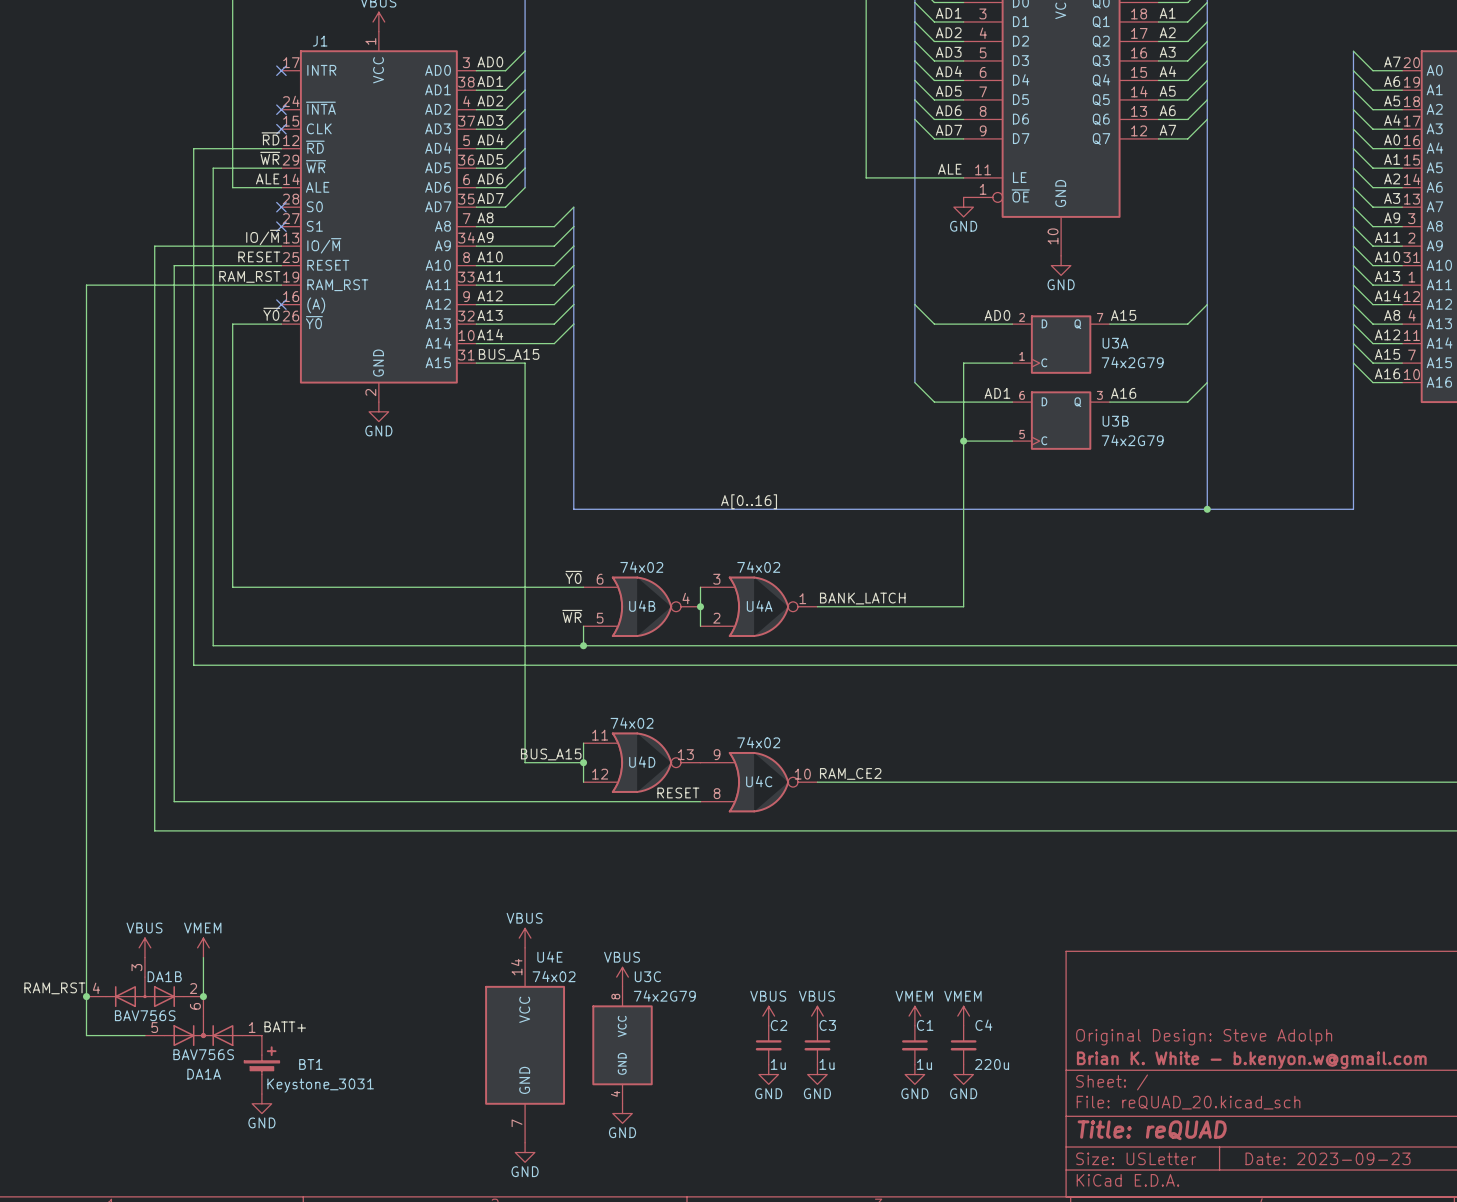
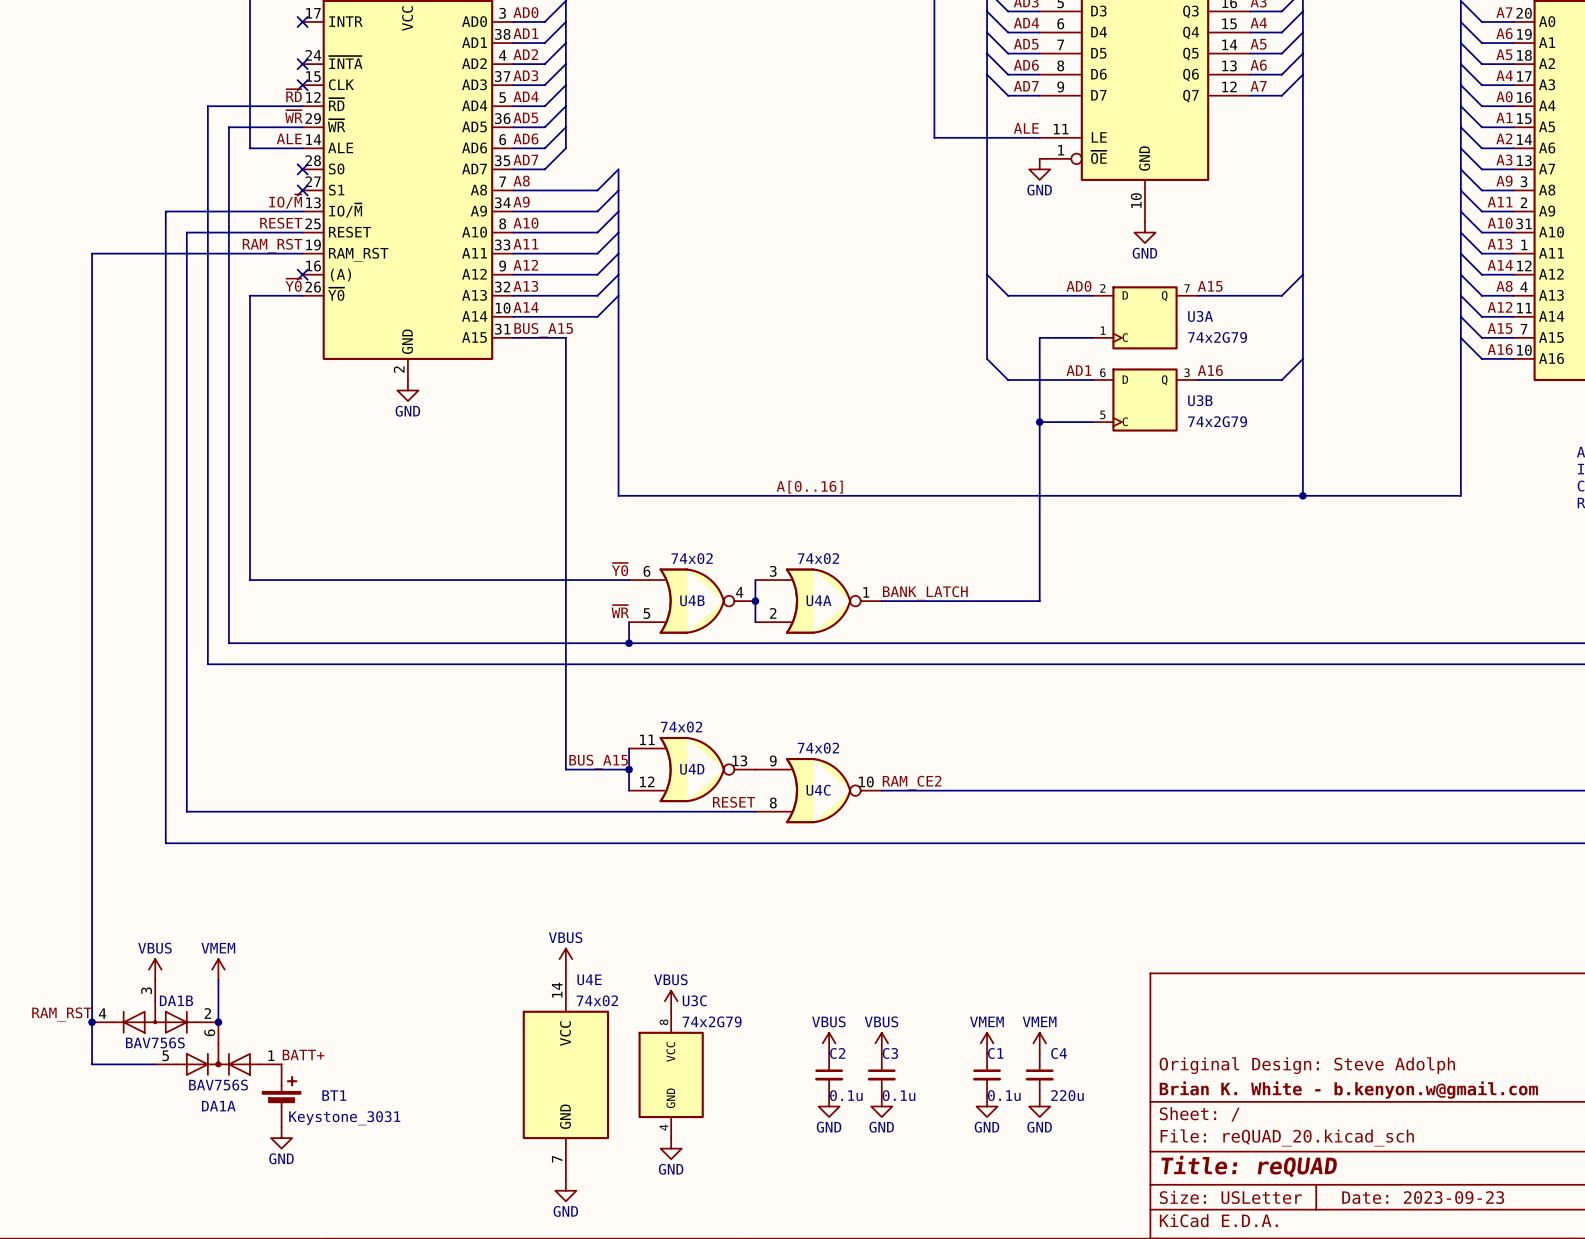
C2 value: 1u (778, 1064) -> 0.1u (846, 1095)
C3 value: 1u (827, 1064) -> 0.1u (898, 1095)
C1 value: 1u (924, 1064) -> 0.1u (1004, 1095)

